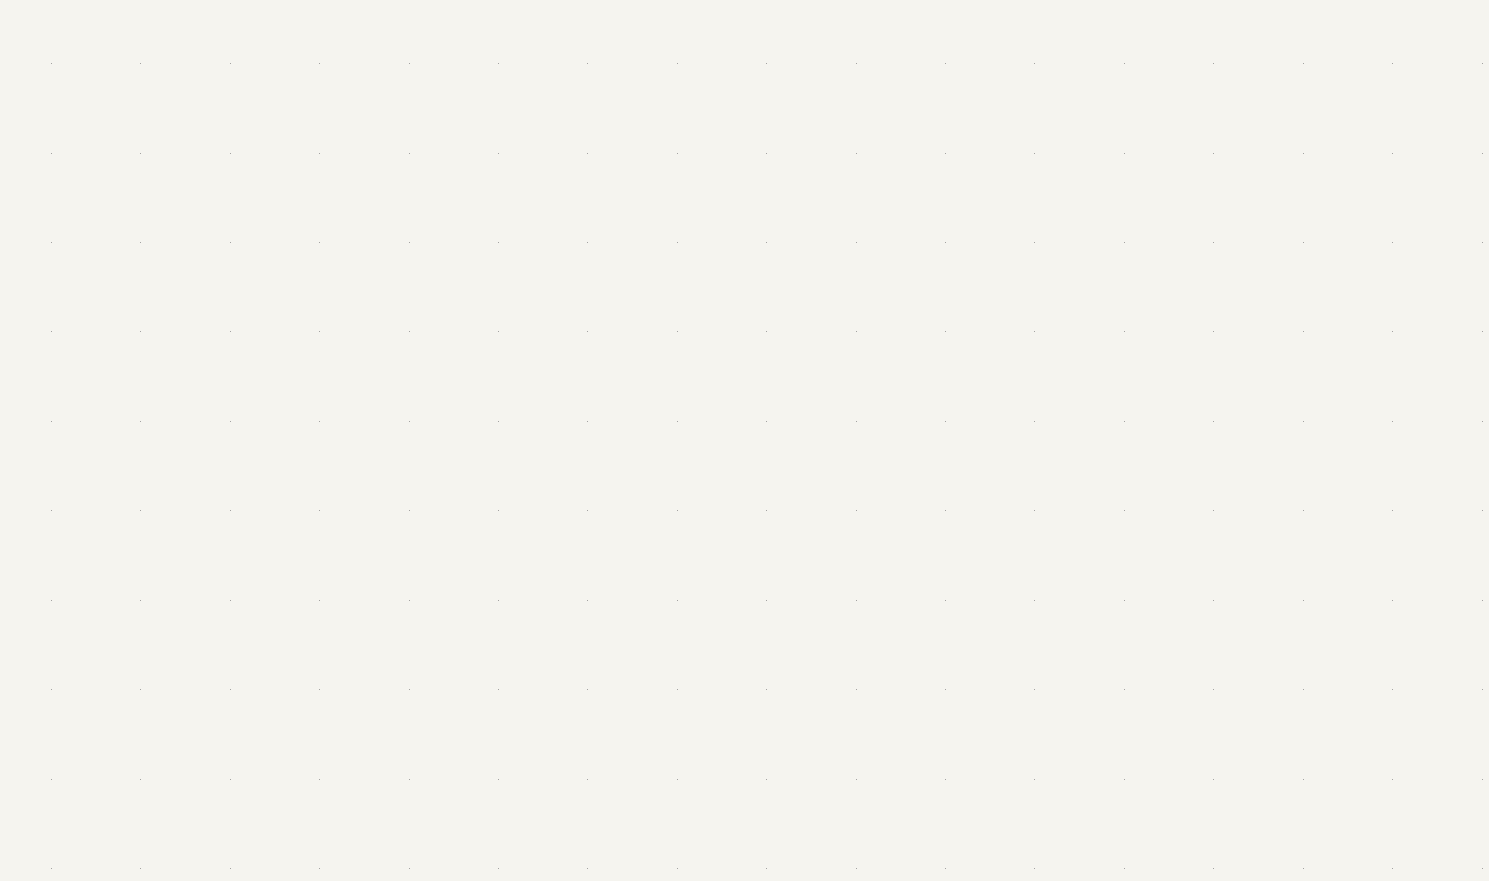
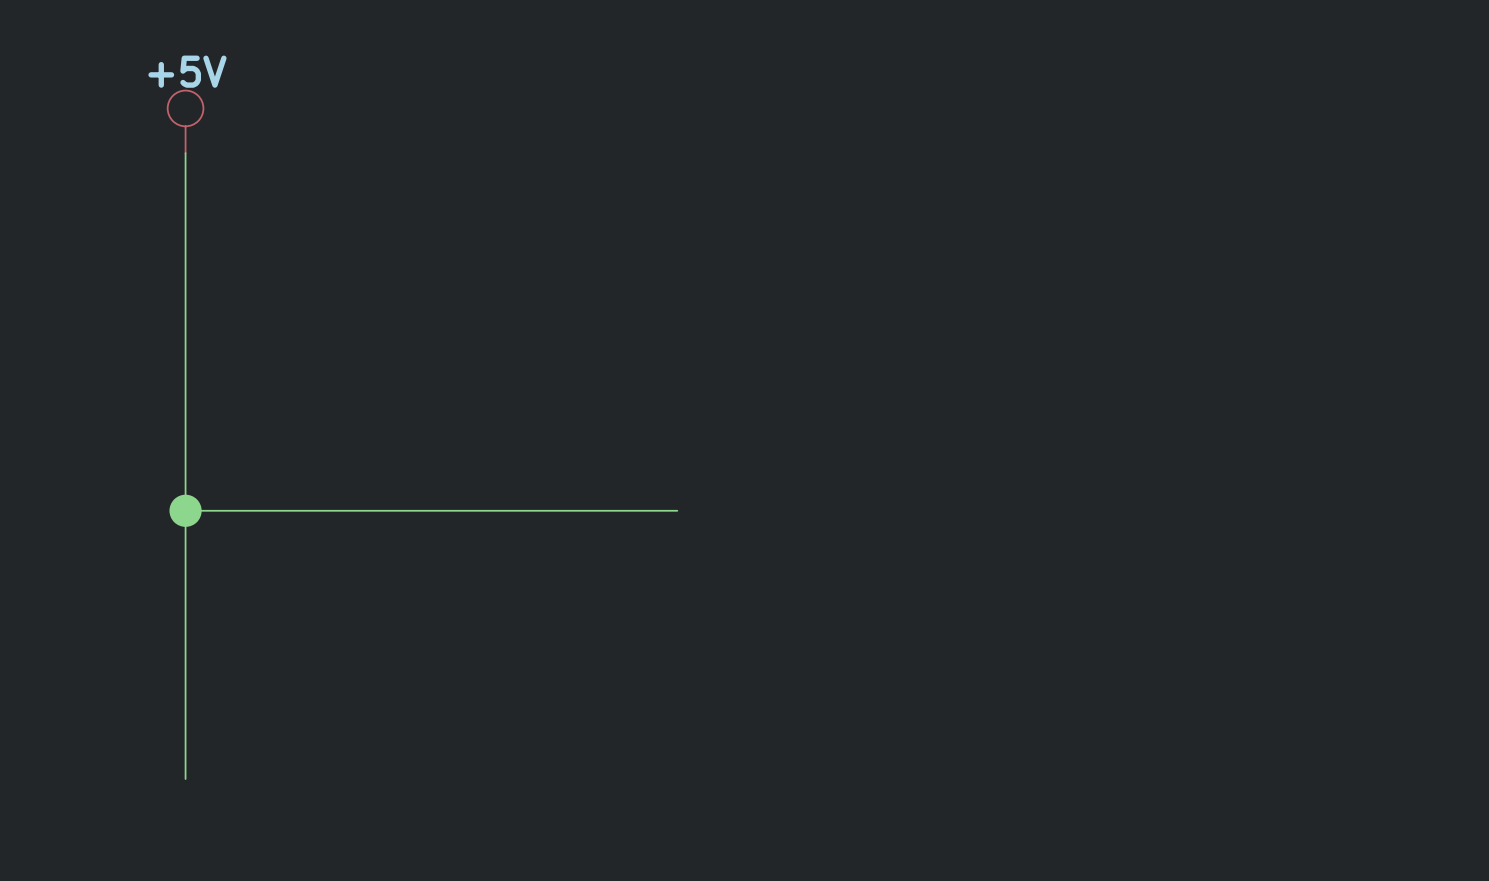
power symbol: none -> +5V (185, 121)
wire: none -> (185, 153) (185, 779)
wire: none -> (185, 510) (677, 510)
junction: none -> (185, 510)

